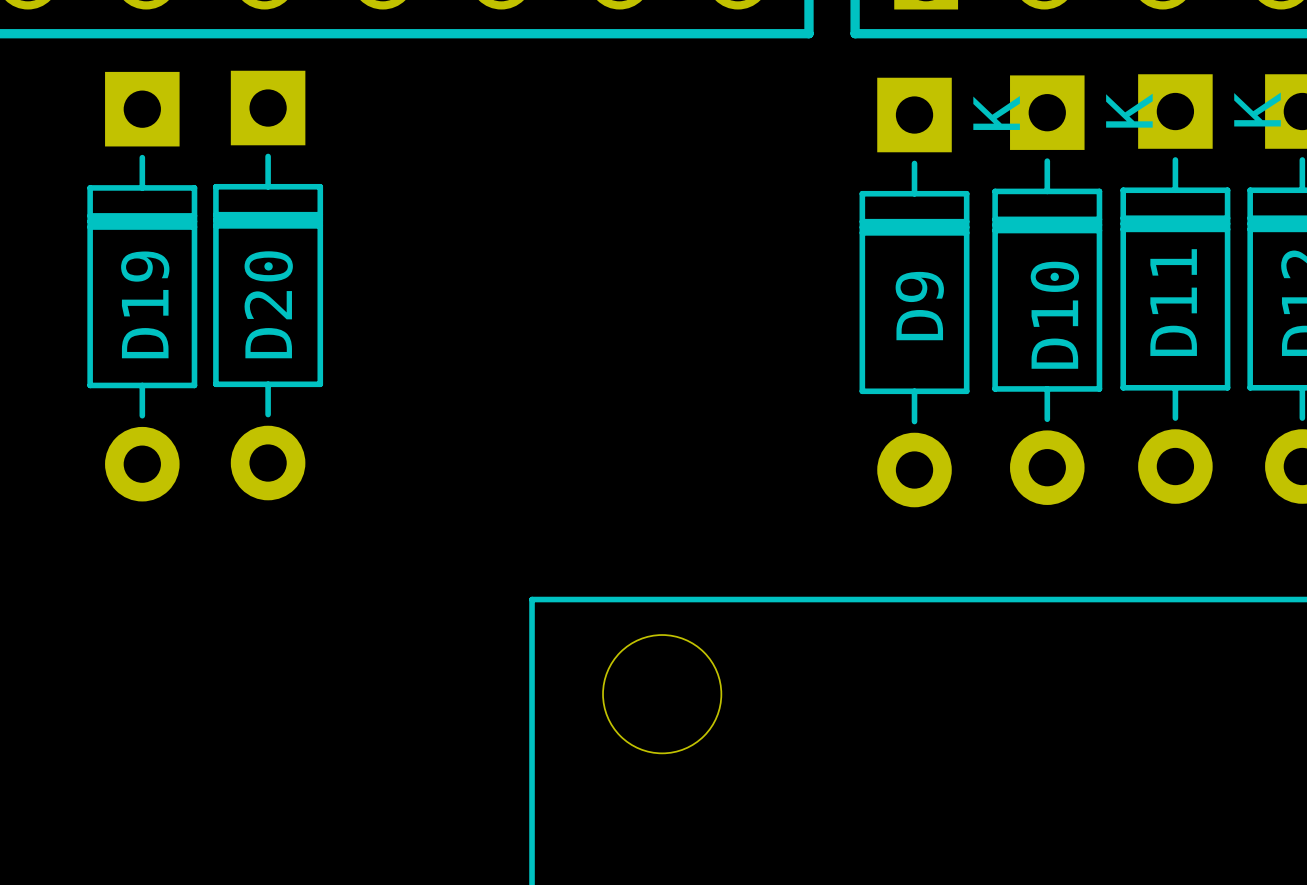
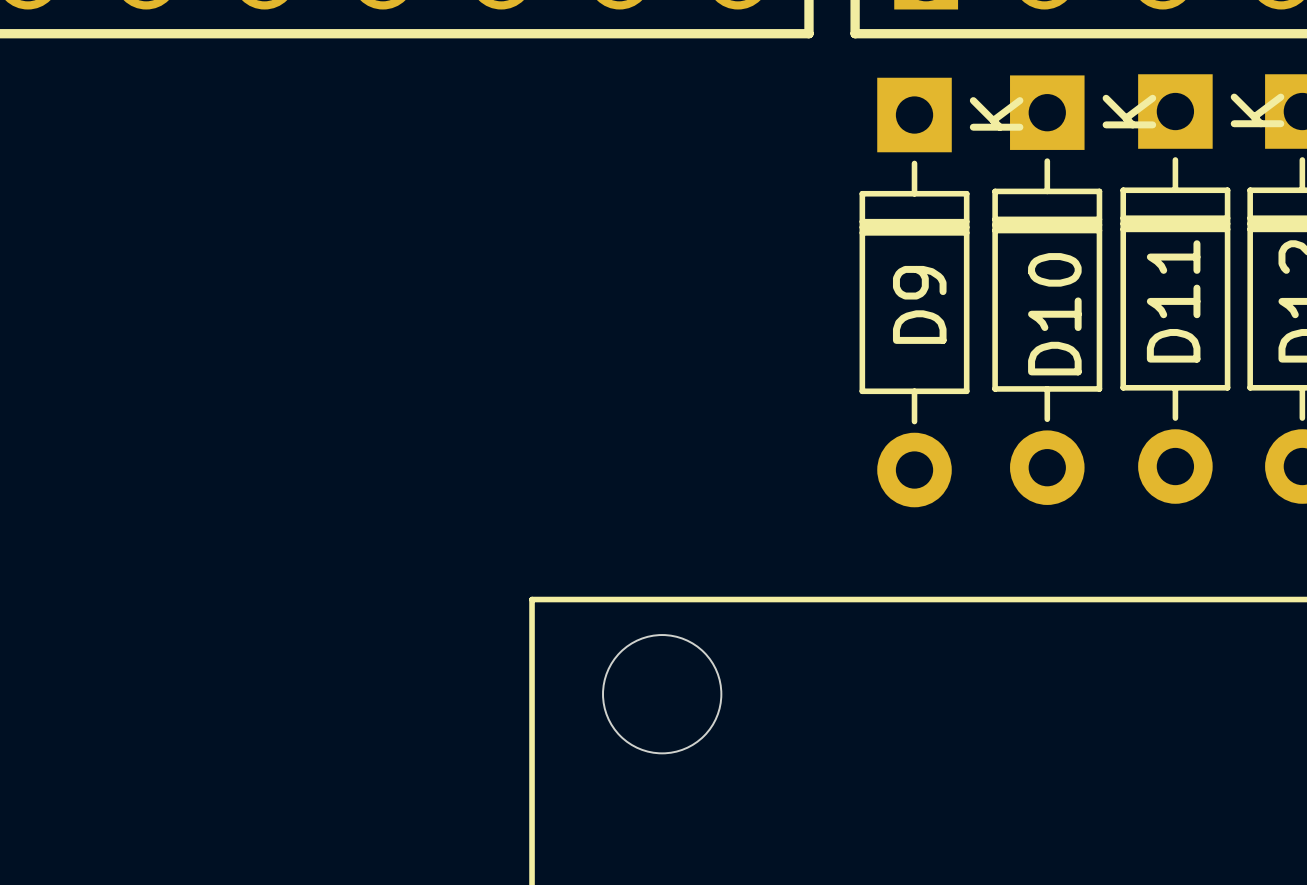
D20: (268, 285) -> none
D19: (142, 286) -> none

